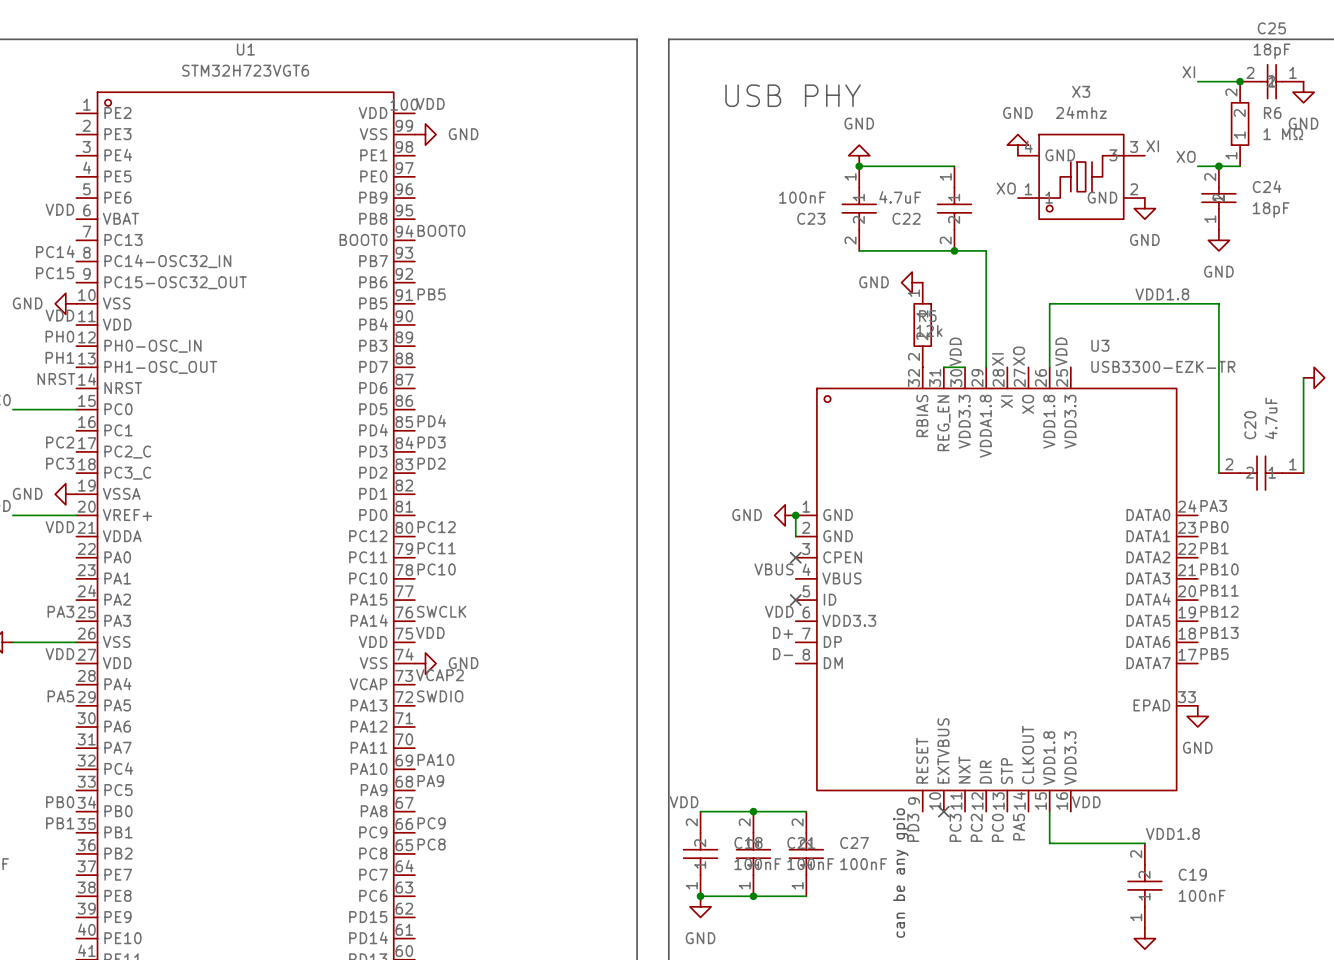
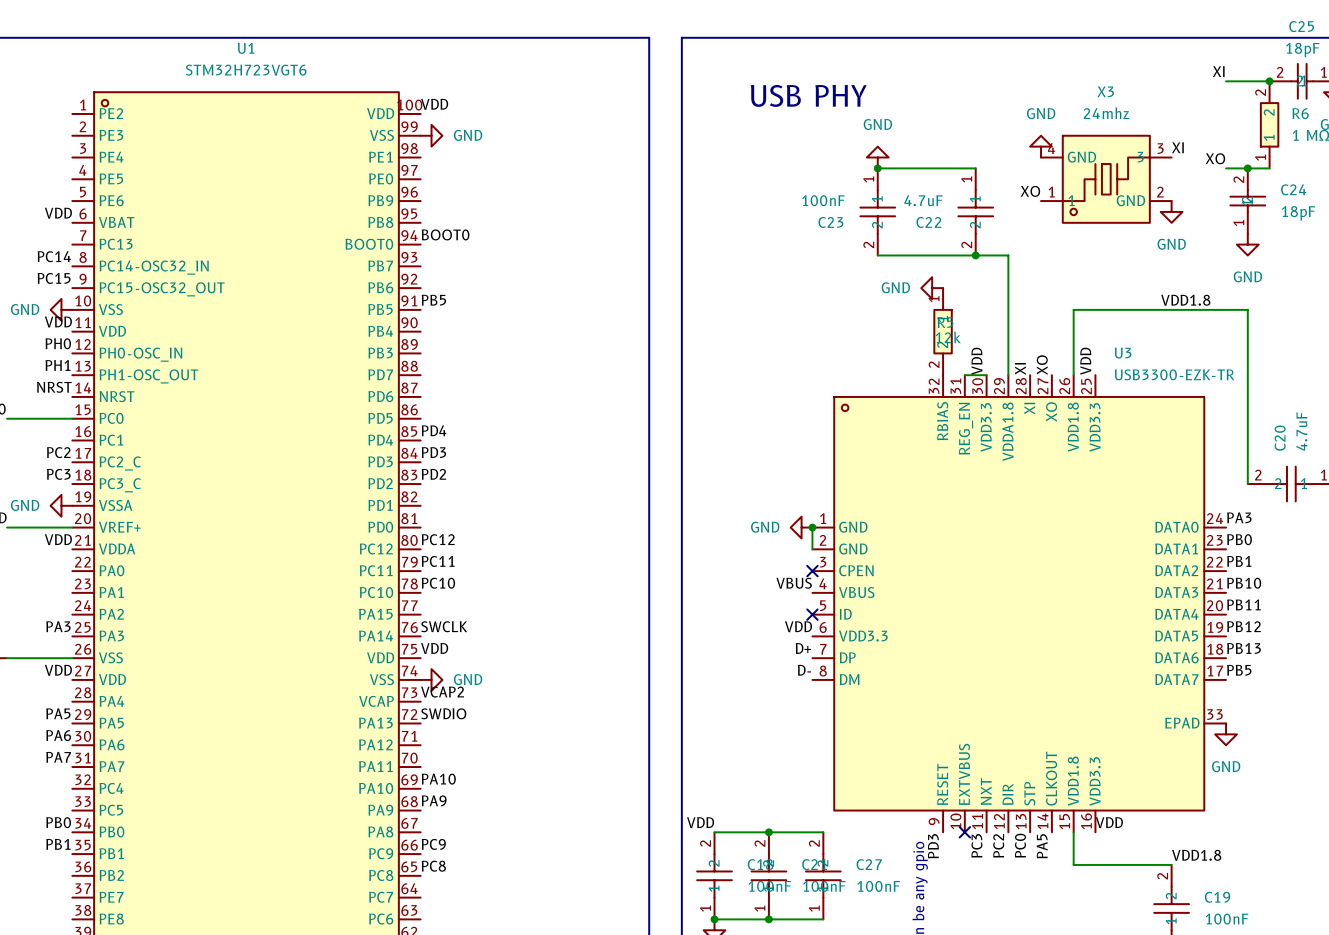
label: none -> PA6 (58, 735)
label: none -> PA7 (58, 757)

